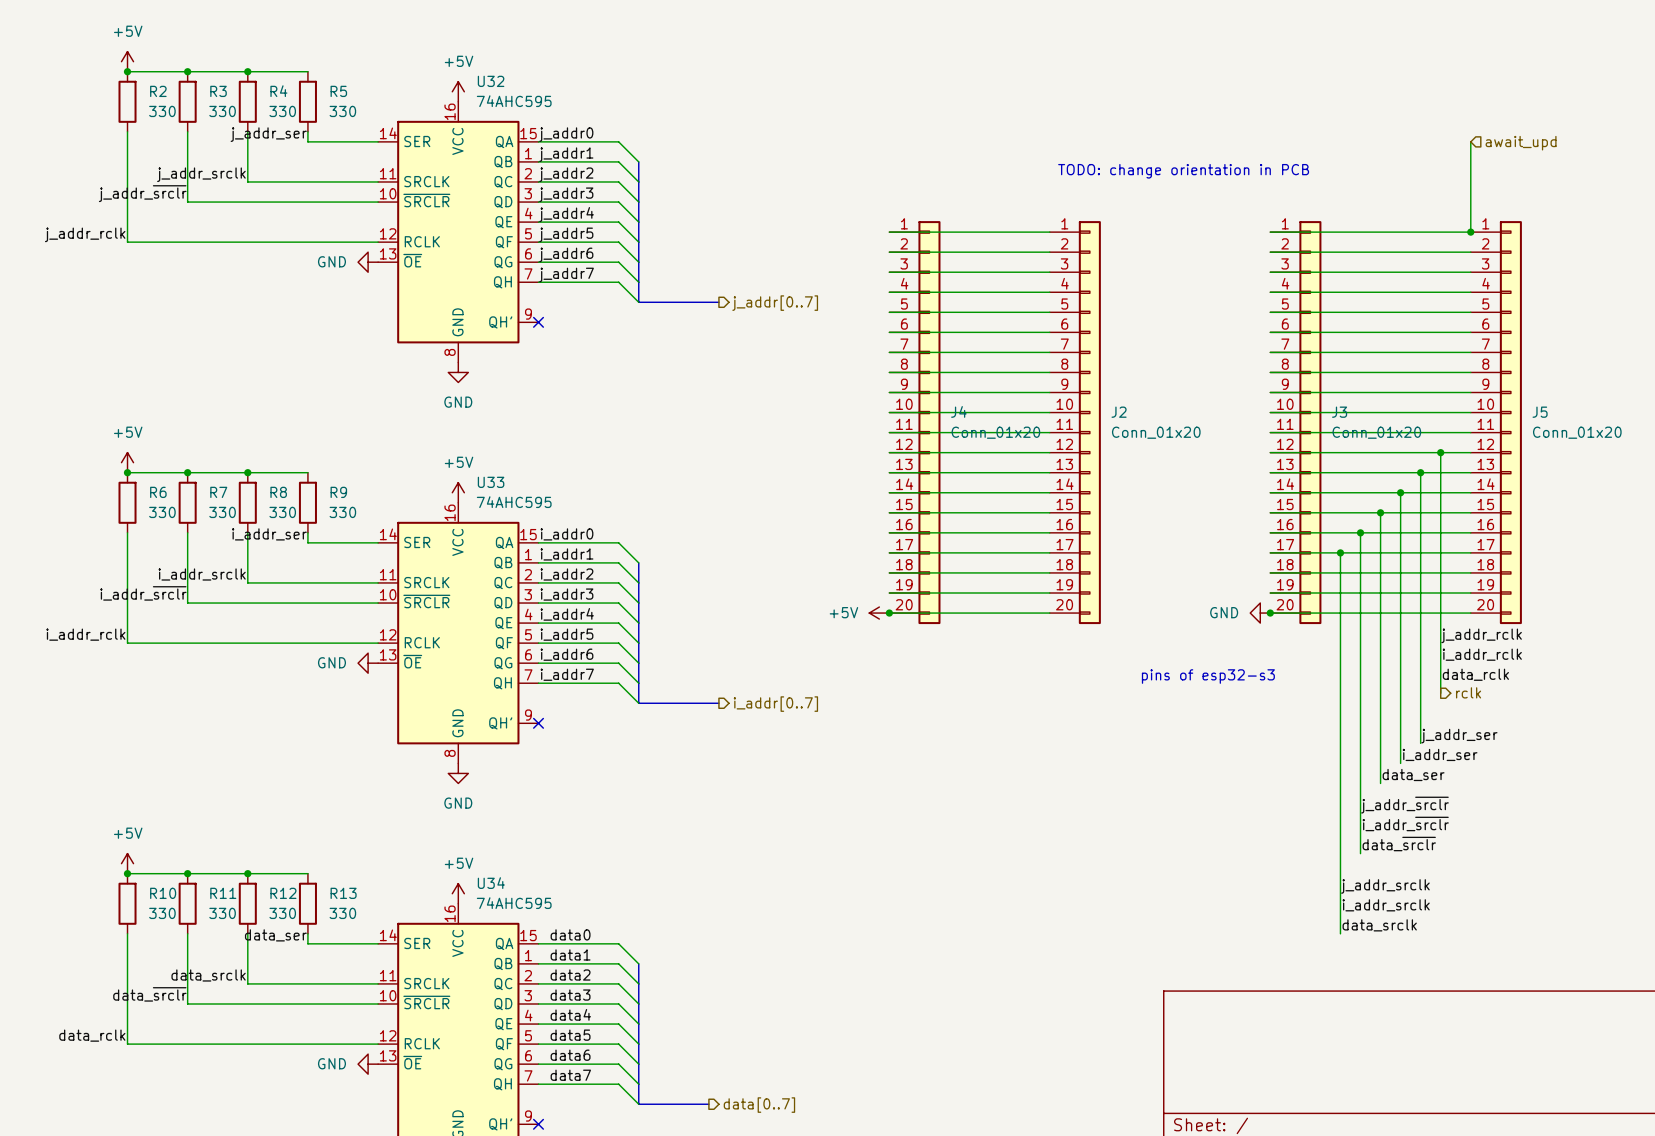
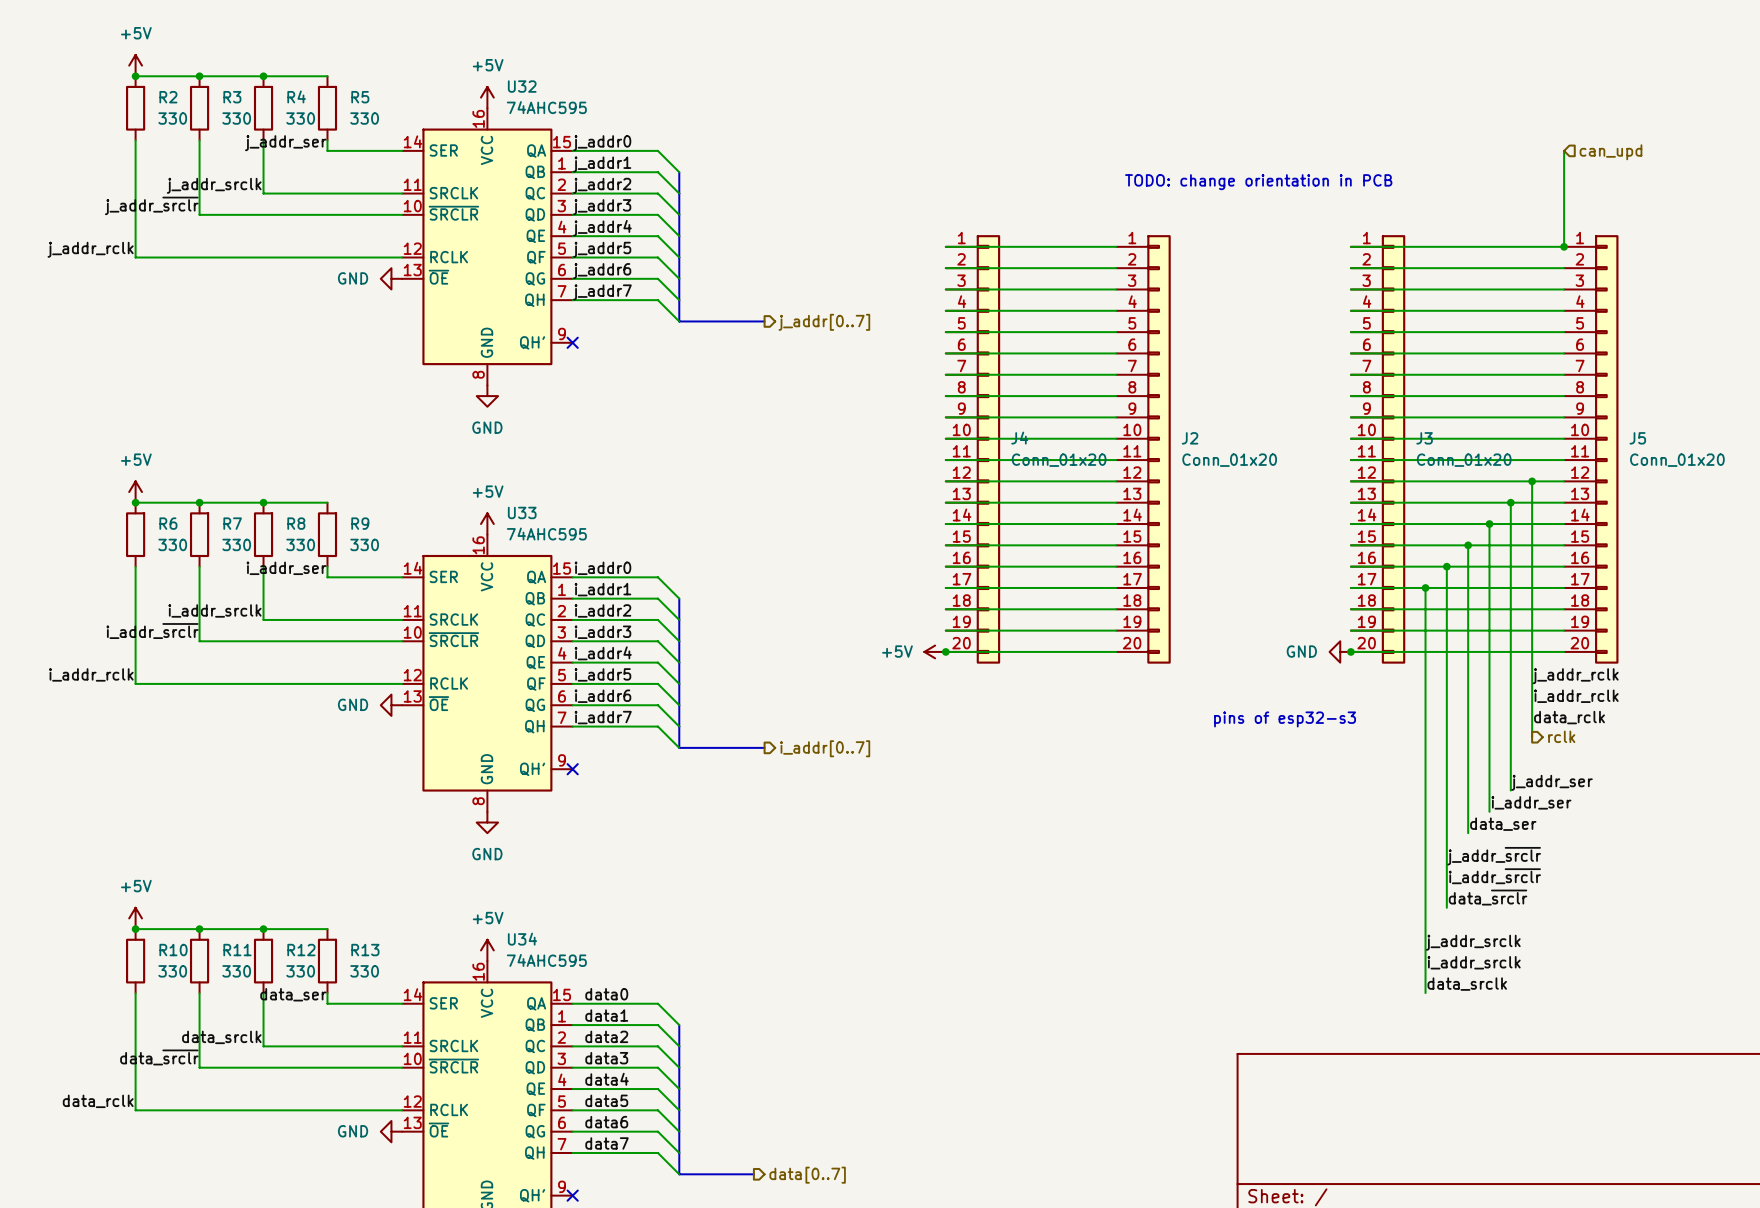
hierarchical label: await_upd (1521, 143) -> can_upd (1610, 152)

